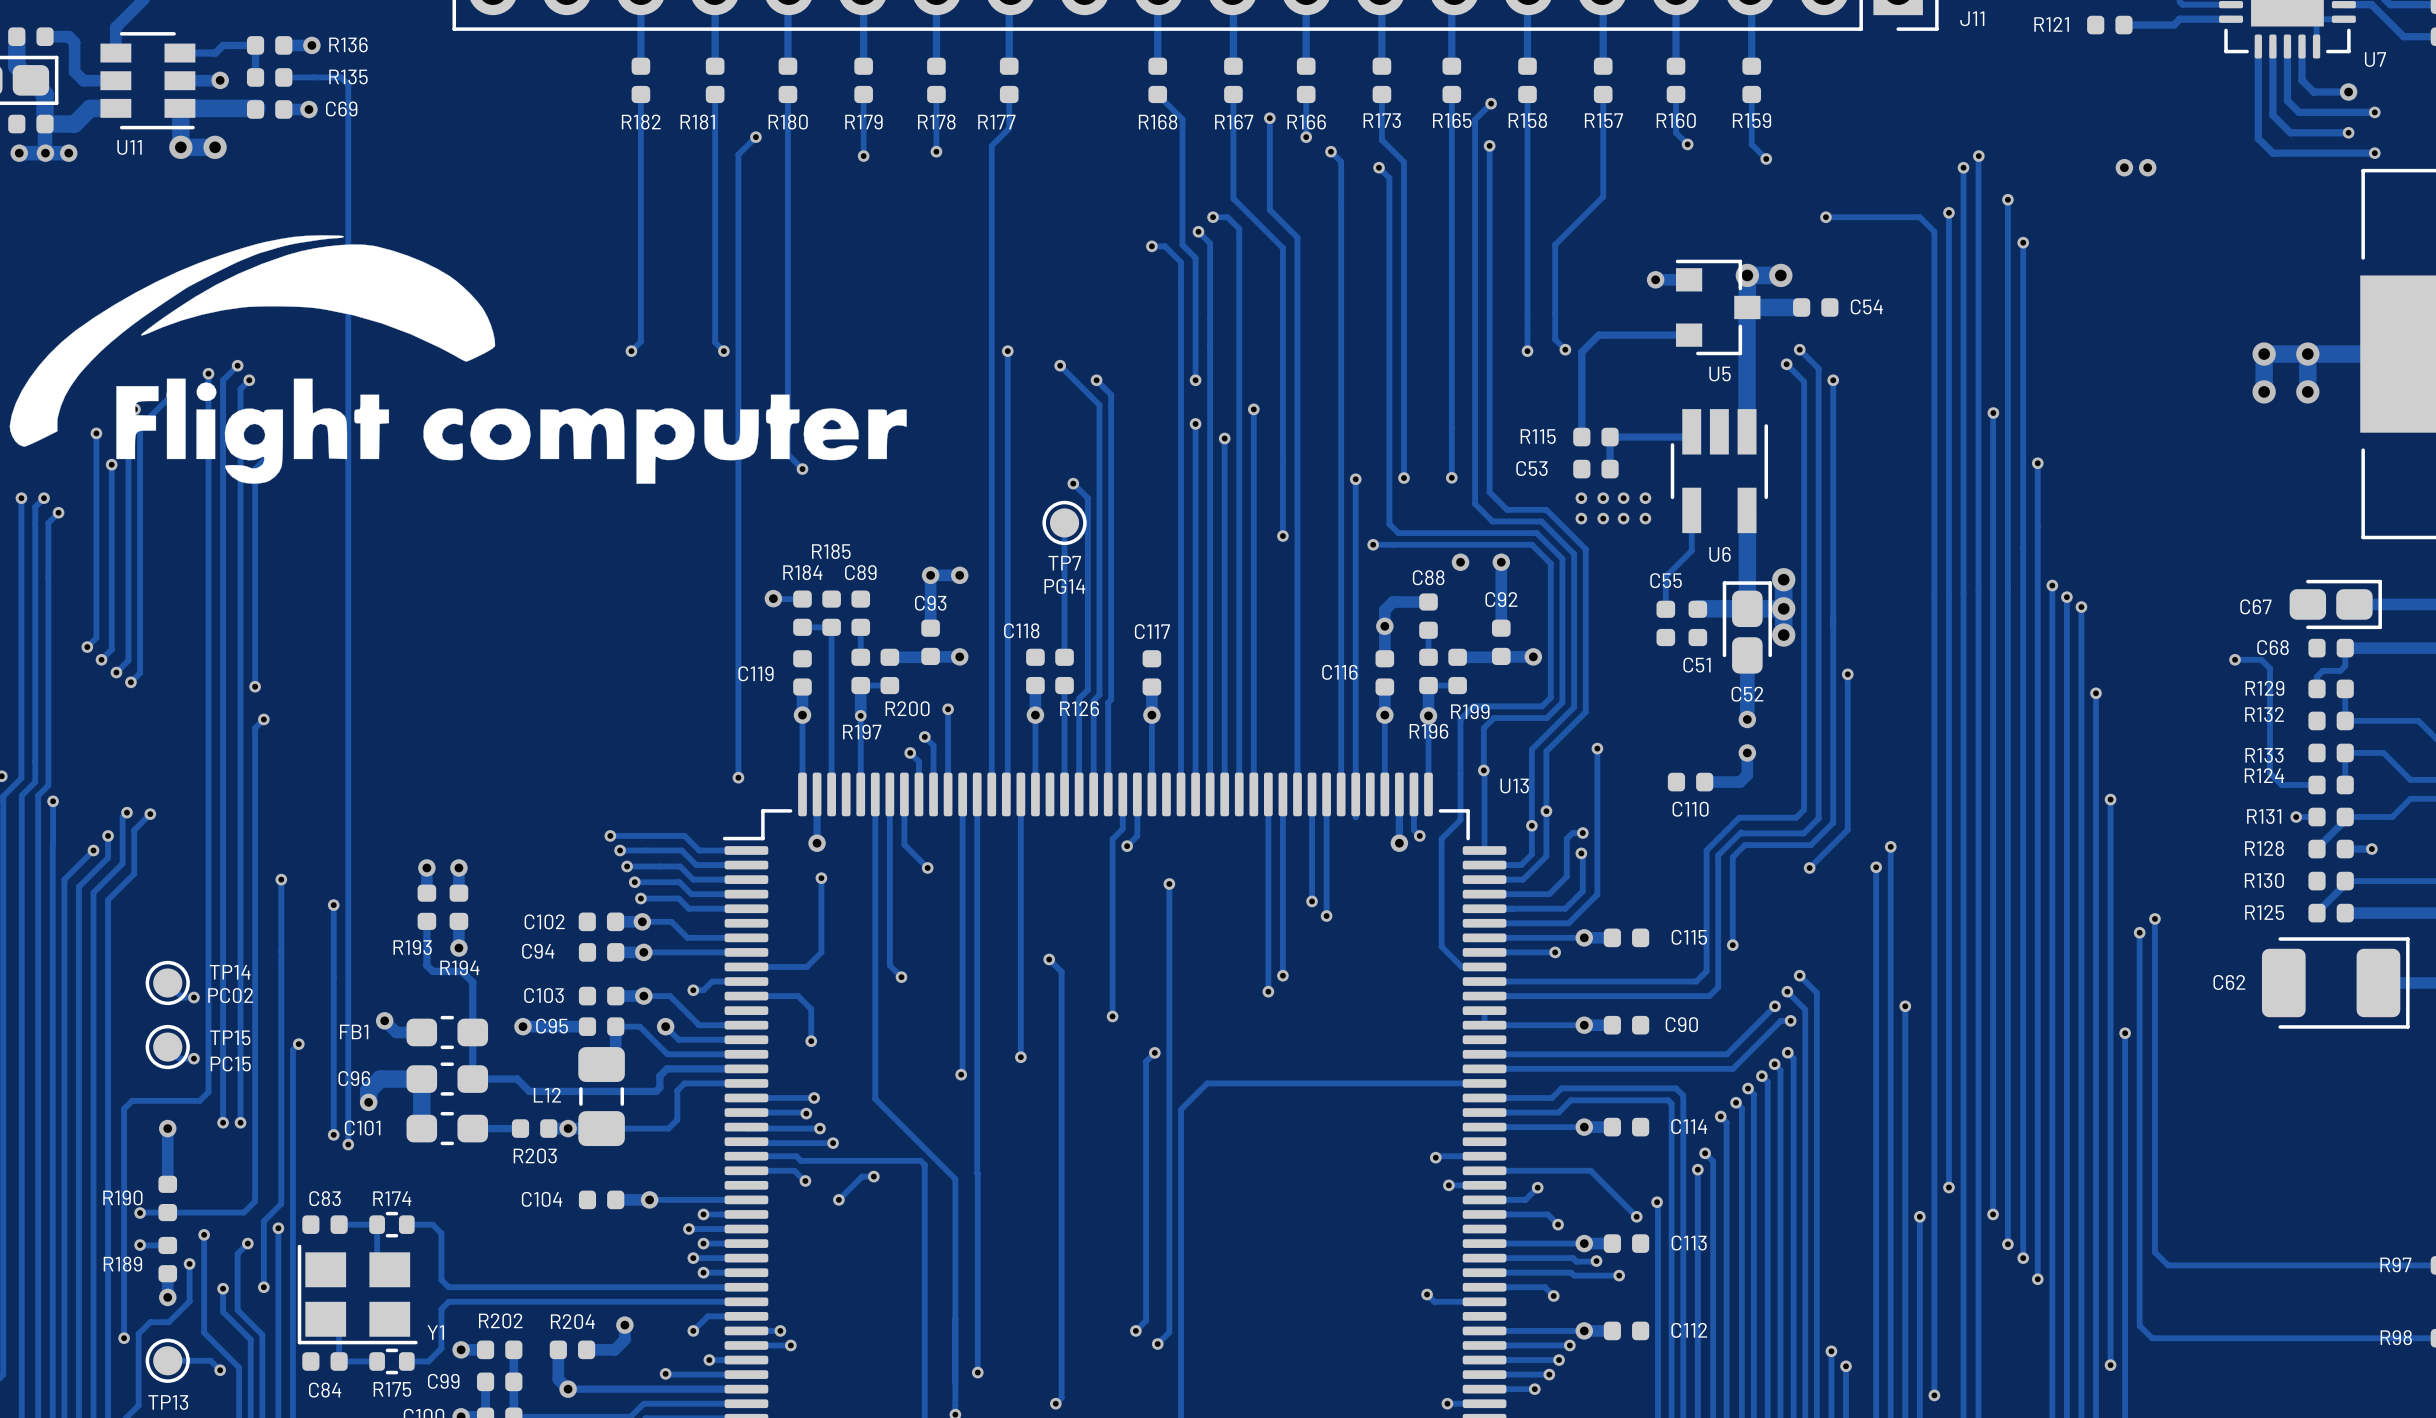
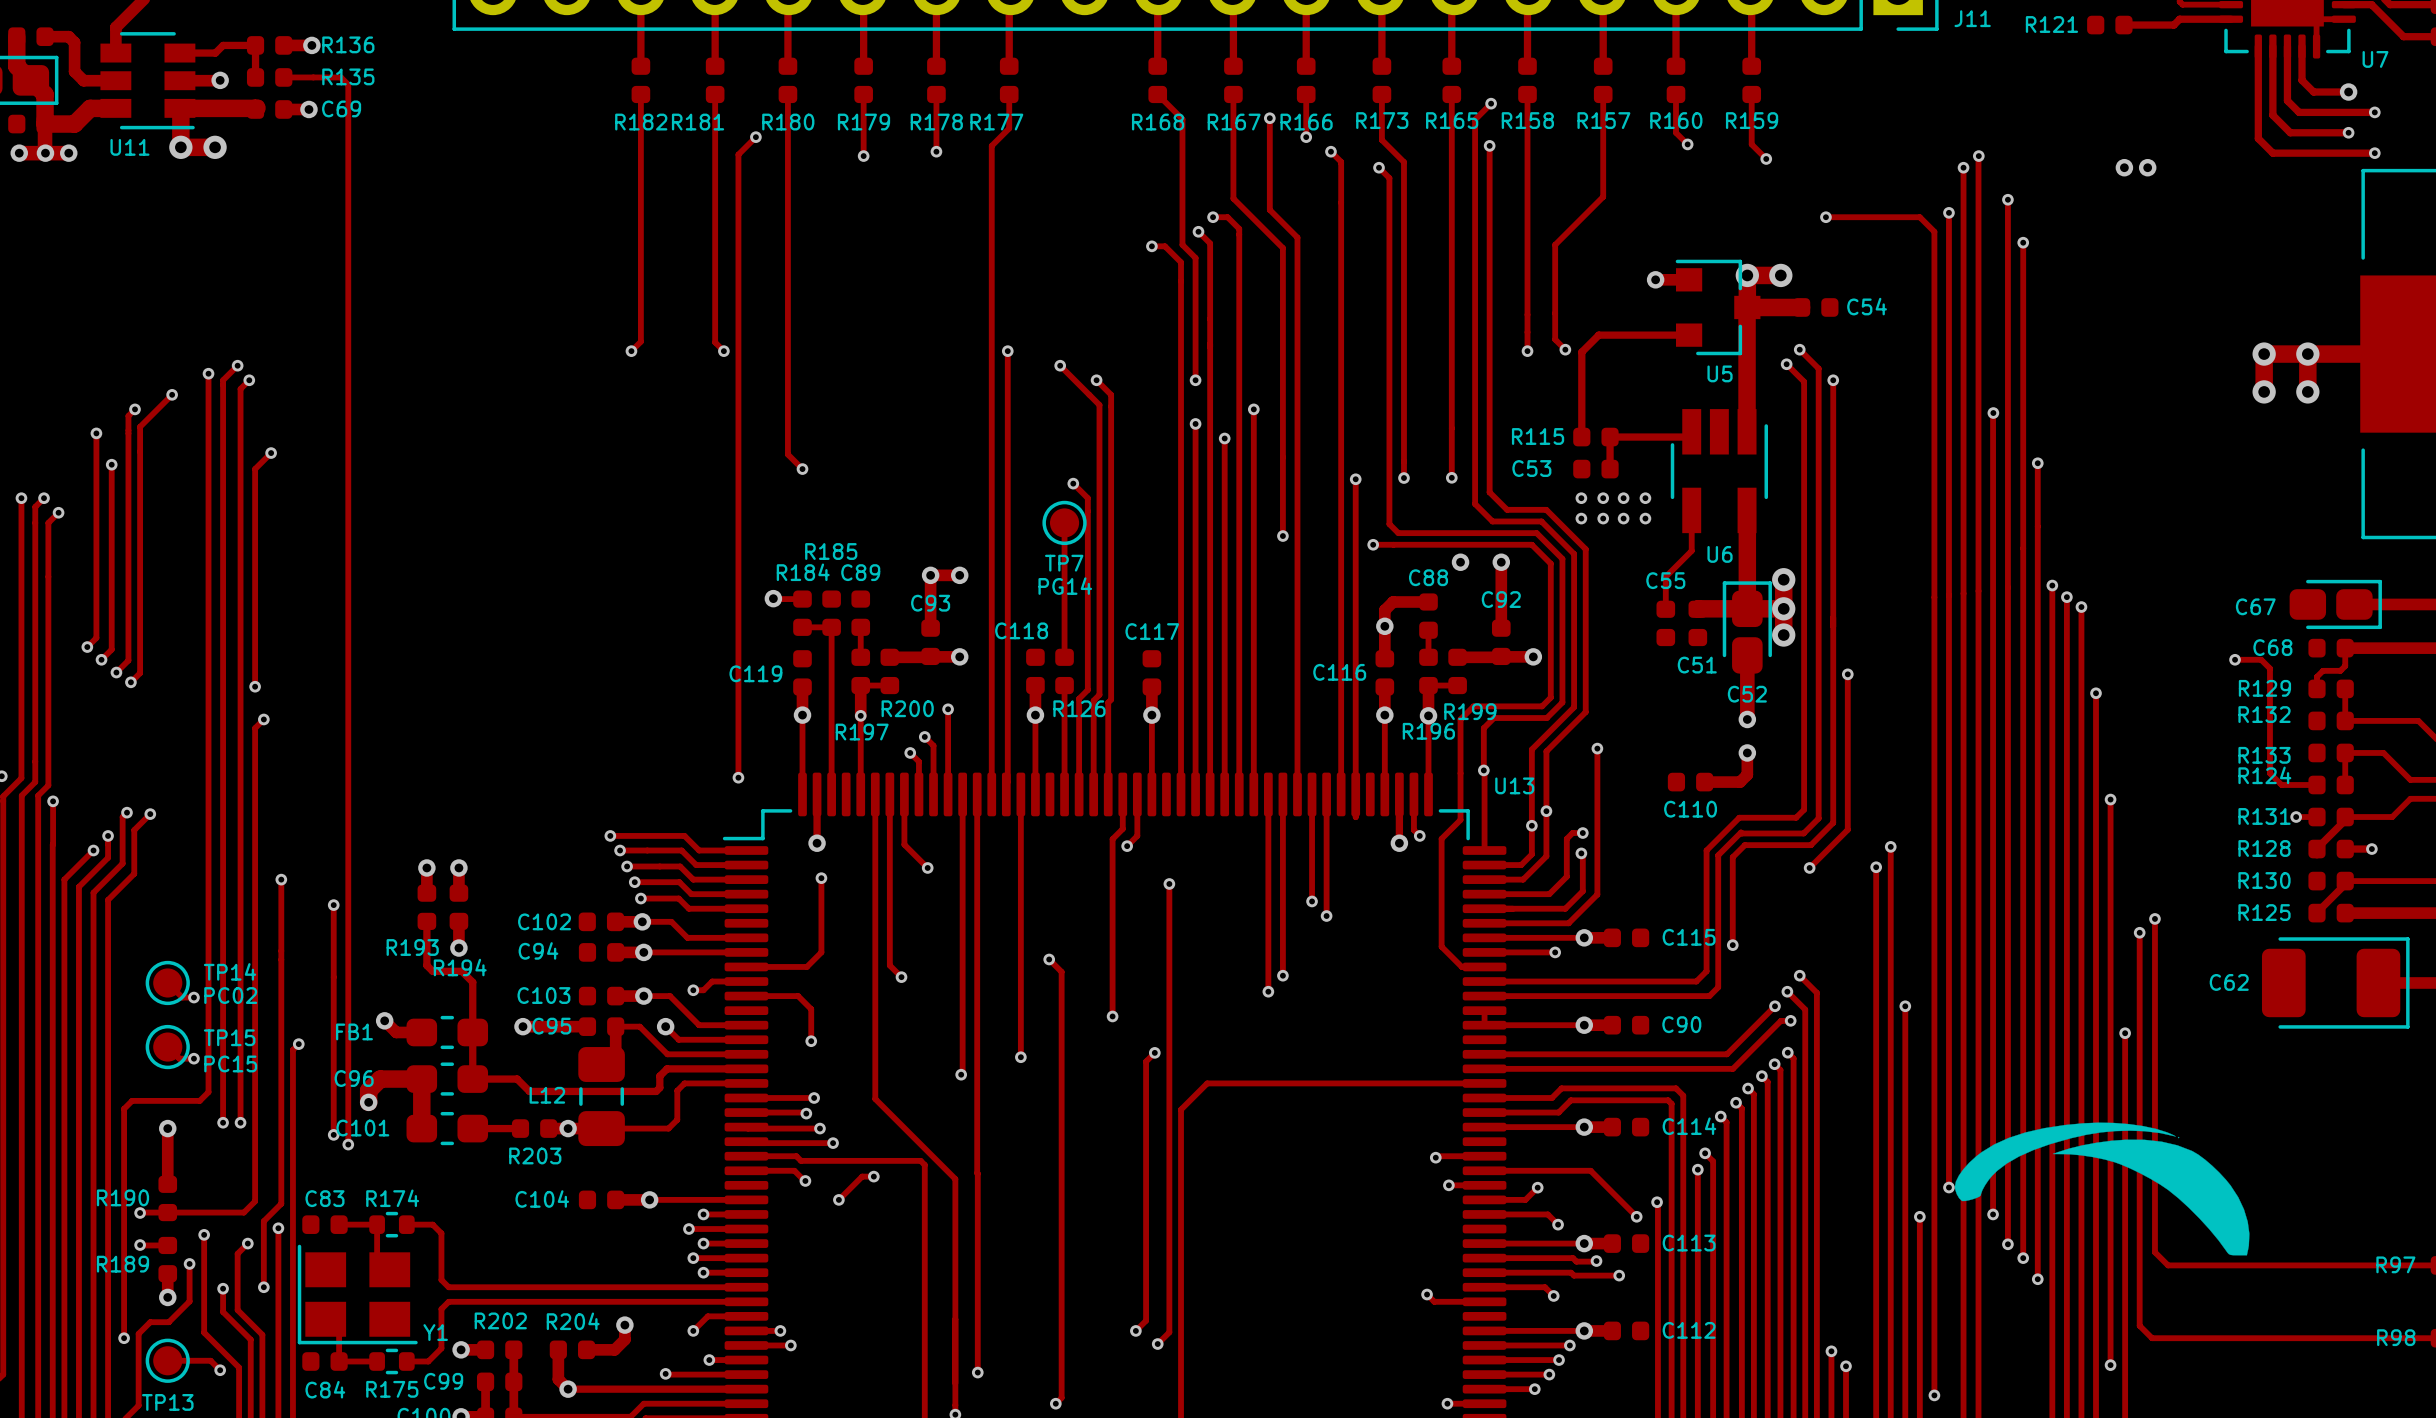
drawing: [9, 235, 907, 484] -> none
drawing: none -> [1954, 1122, 2250, 1256]

